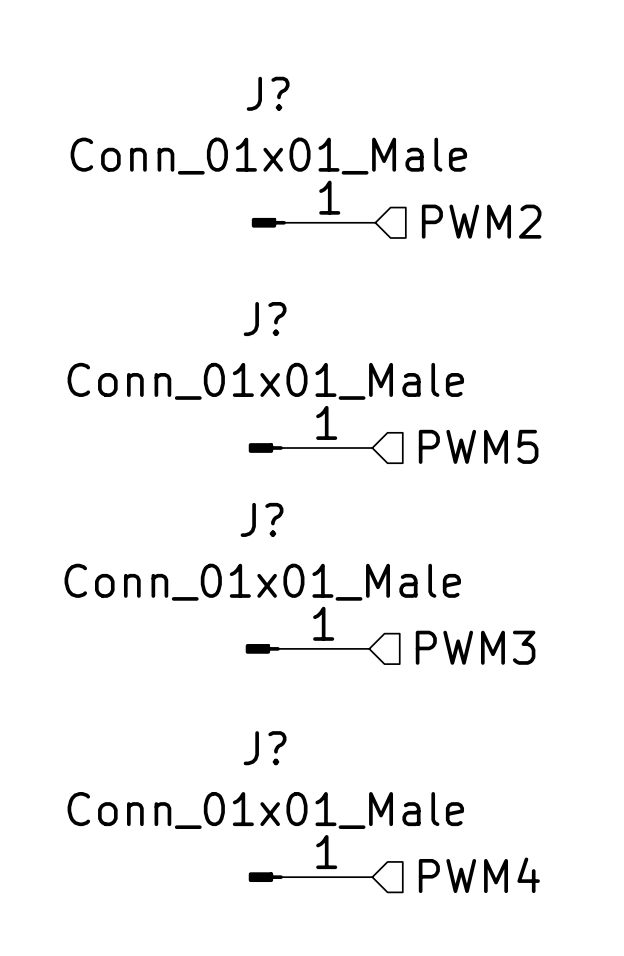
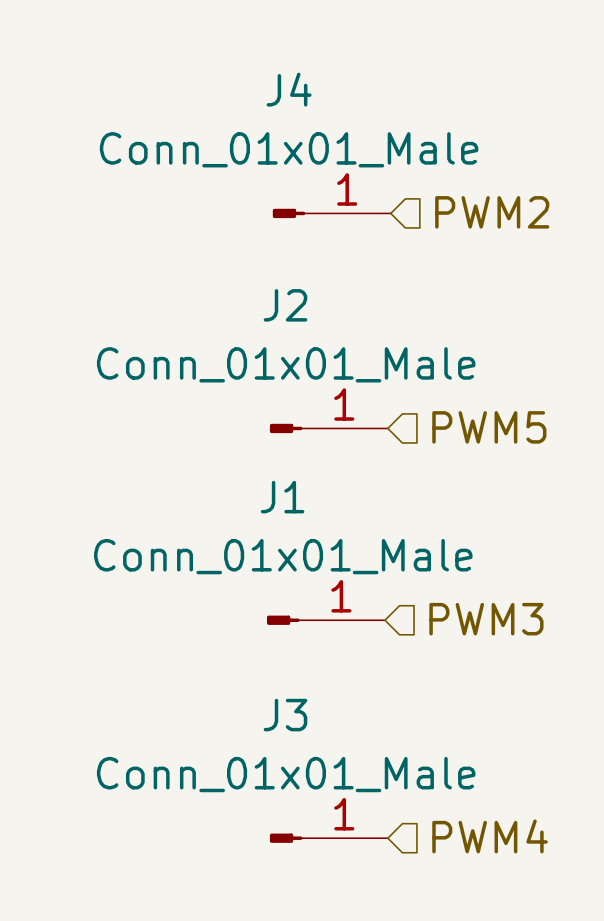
J? name: J? (268, 93) -> J4 (289, 89)
J? name: J? (265, 319) -> J2 (285, 305)
J? name: J? (262, 519) -> J1 (282, 497)
J? name: J? (265, 748) -> J3 (285, 715)

